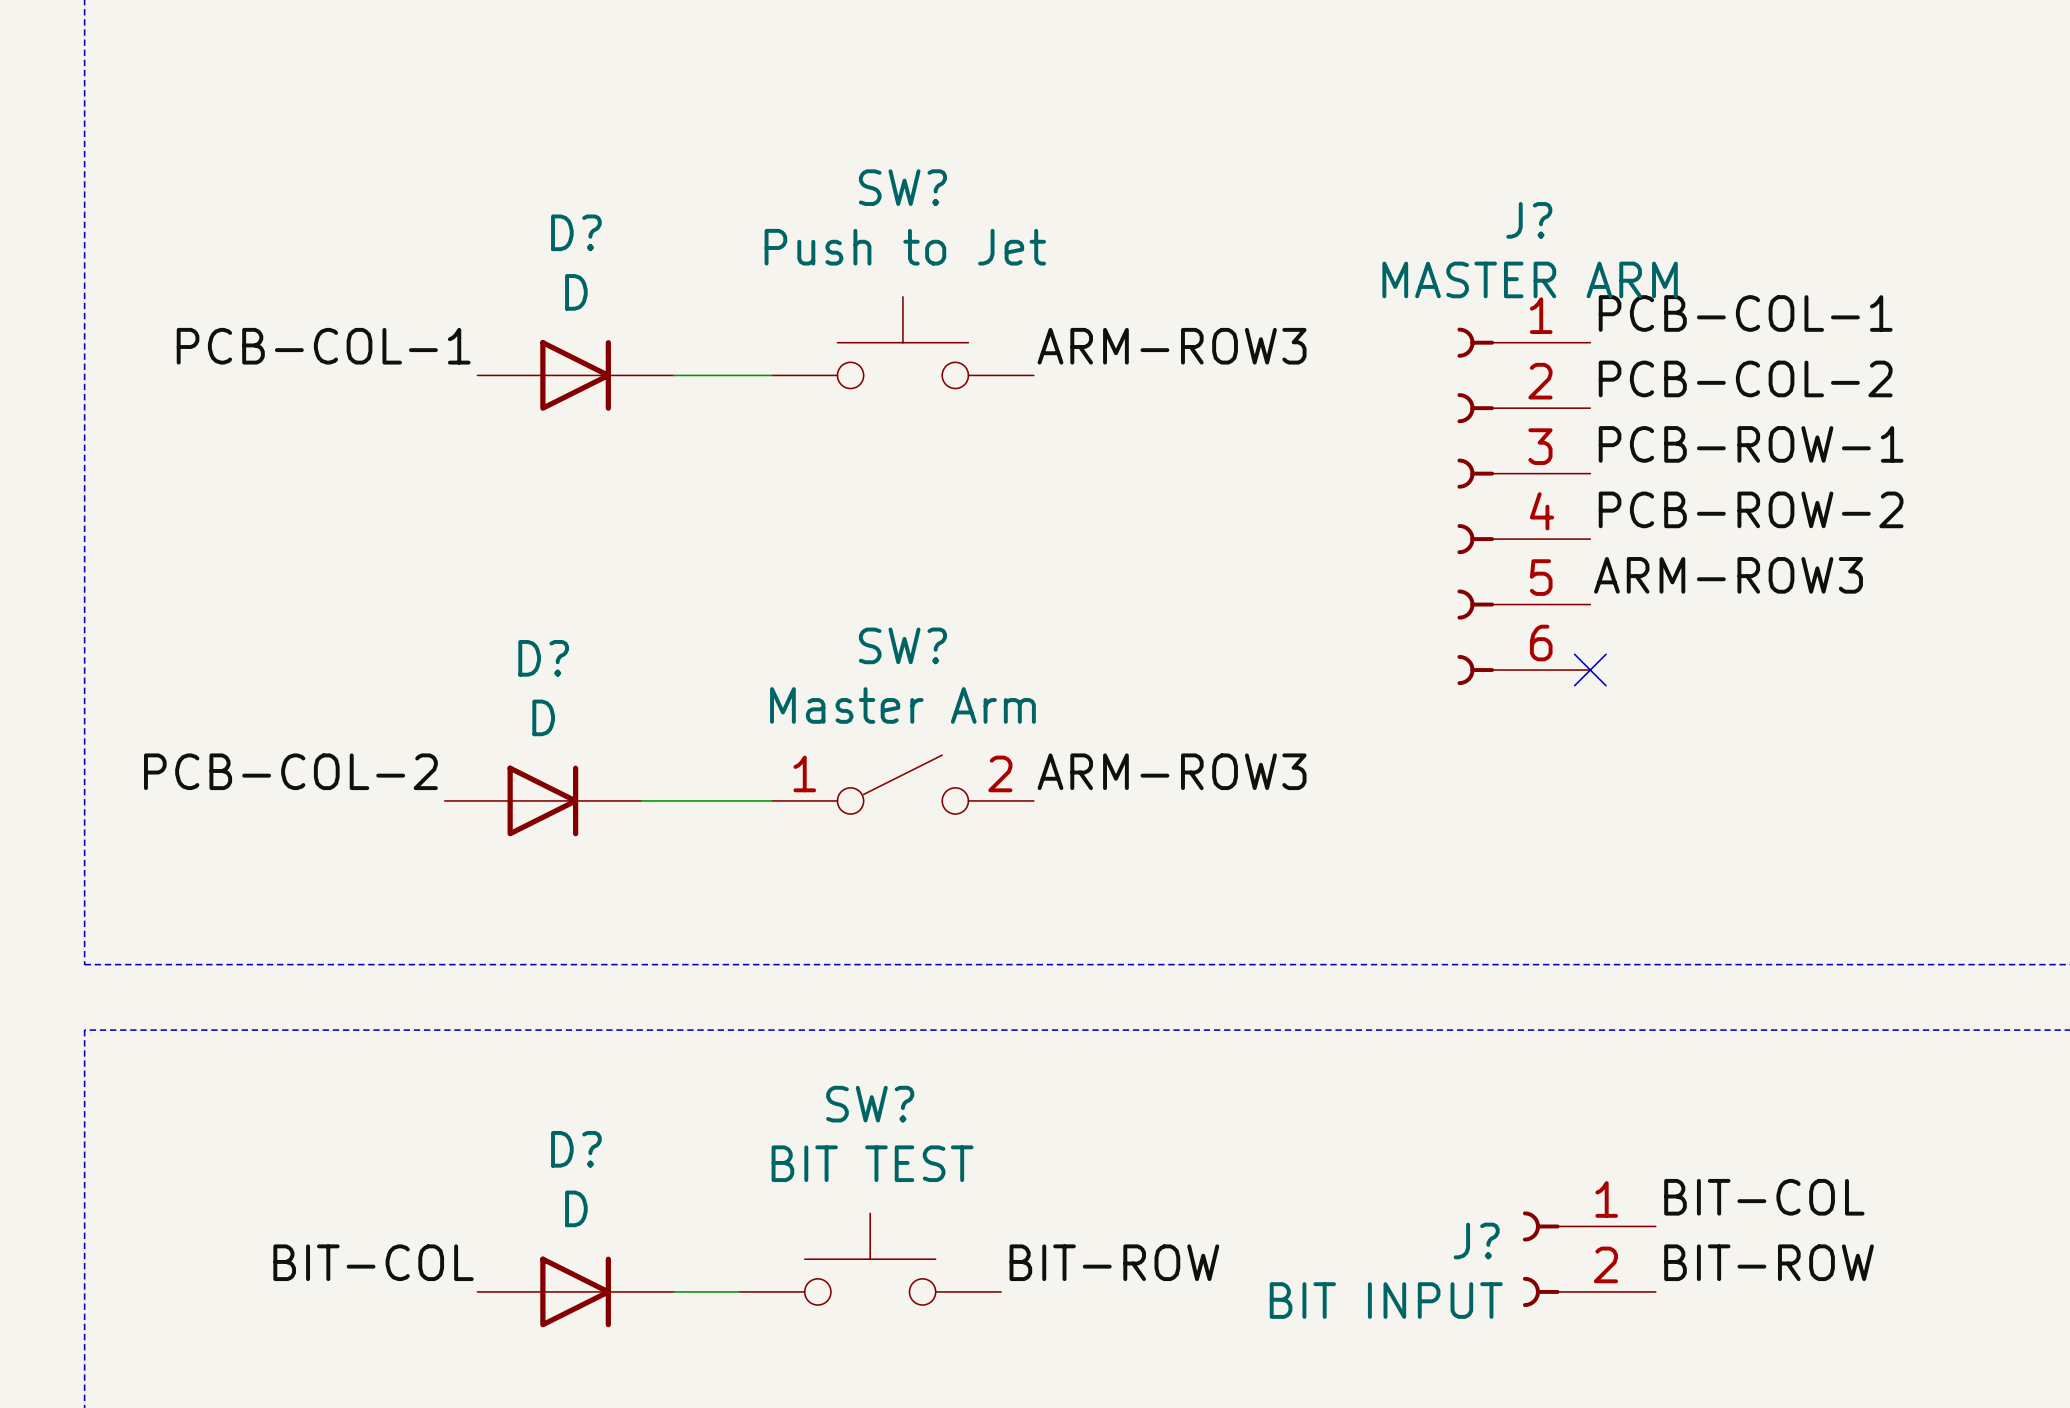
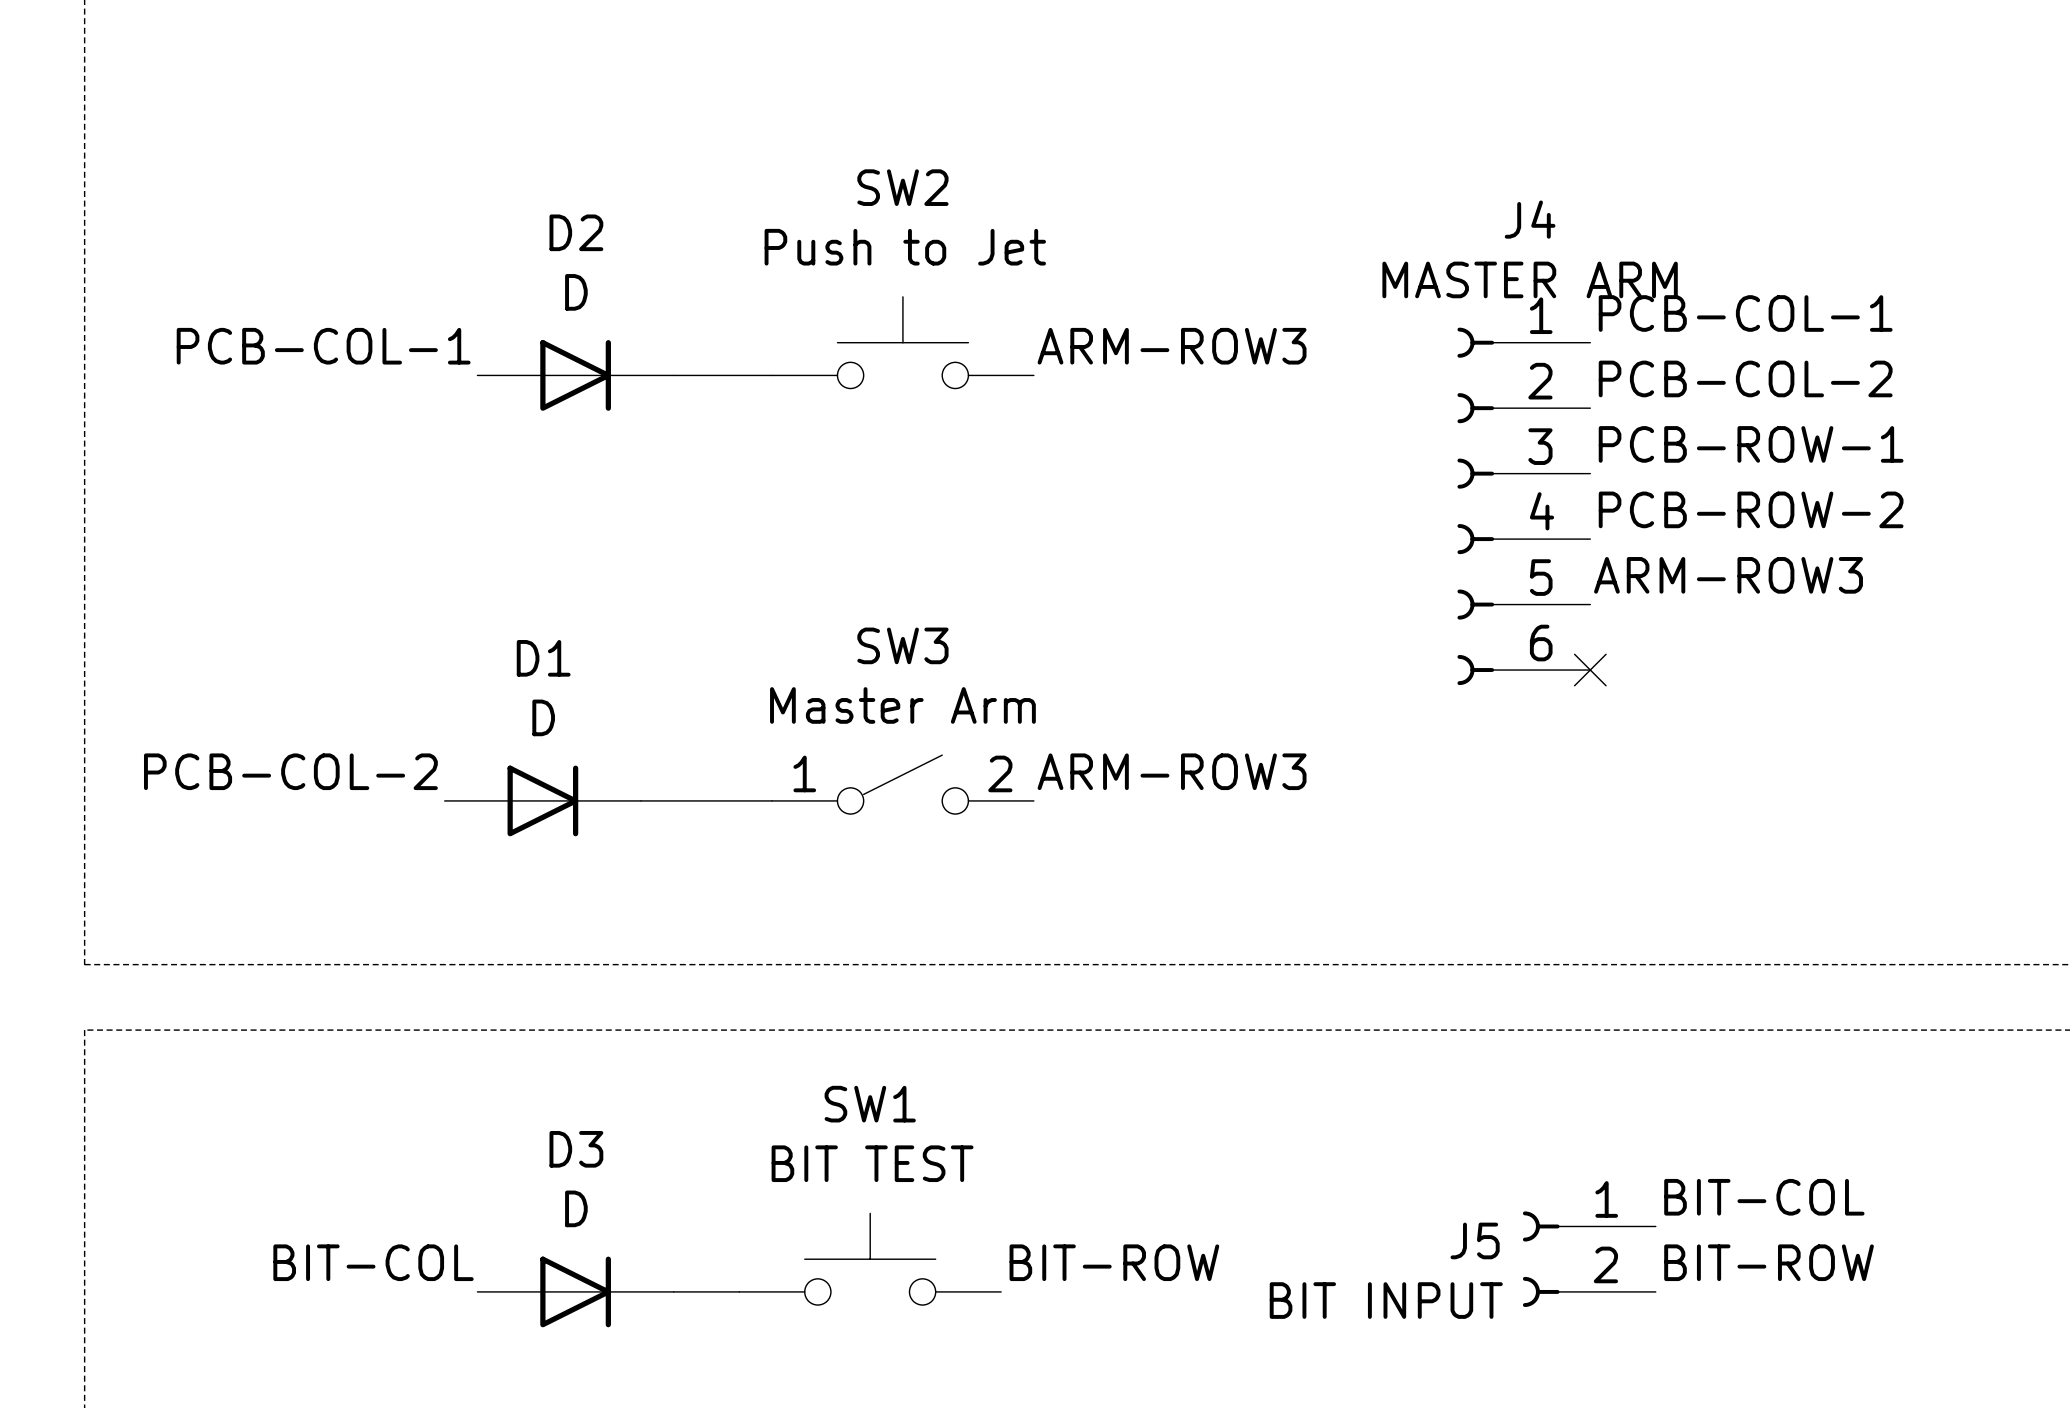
SW? name: SW? (902, 187) -> SW2 (902, 187)
J? name: J? (1529, 220) -> J4 (1530, 219)
D? name: D? (576, 232) -> D2 (576, 232)
SW? name: SW? (902, 645) -> SW3 (902, 645)
D? name: D? (543, 658) -> D1 (543, 658)
SW? name: SW? (870, 1104) -> SW1 (870, 1104)
D? name: D? (576, 1149) -> D3 (576, 1149)
J? name: J? (1476, 1240) -> J5 (1475, 1240)

